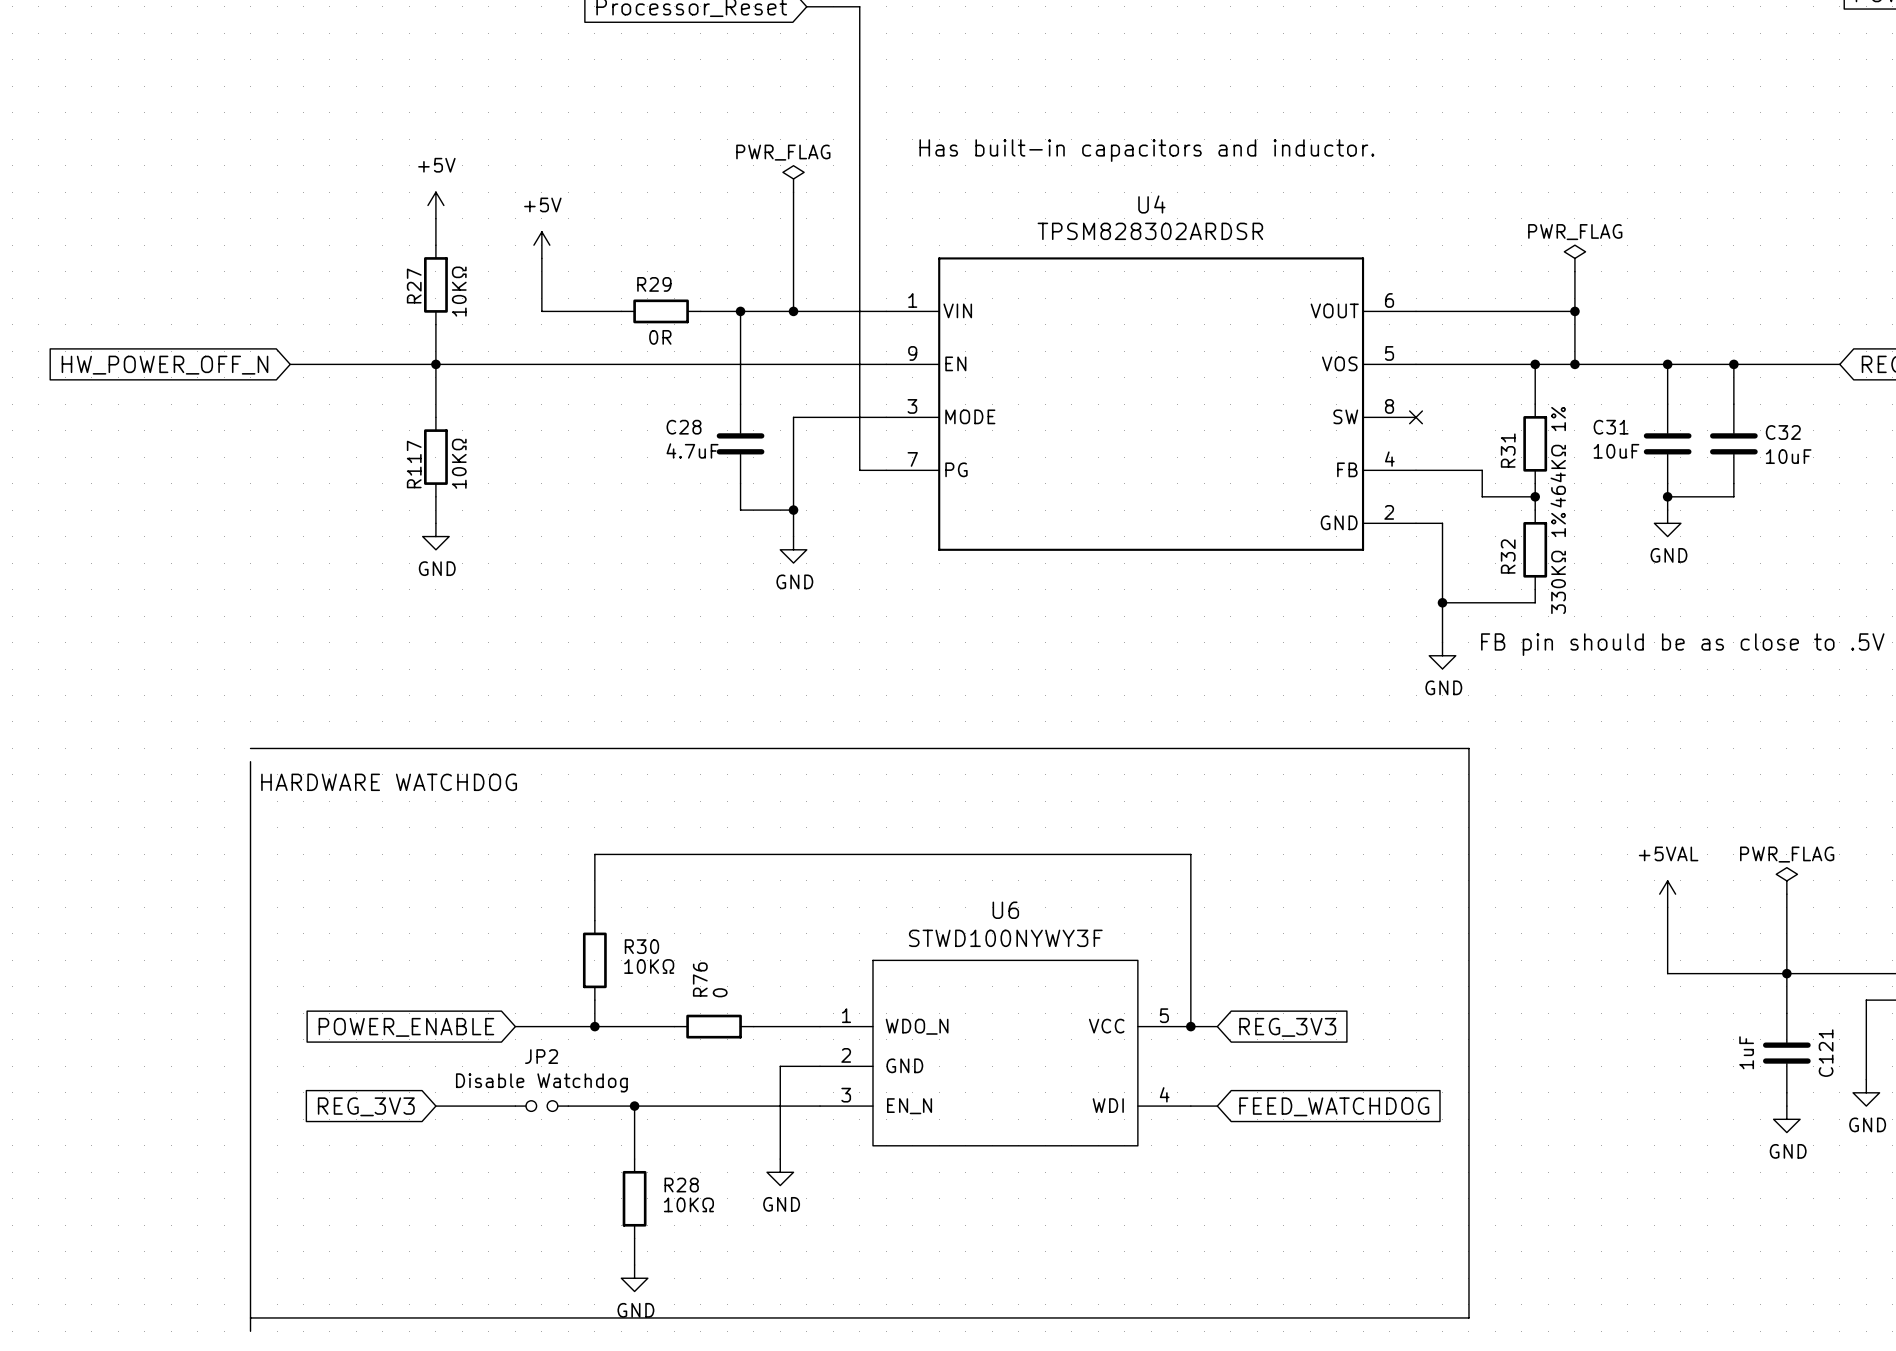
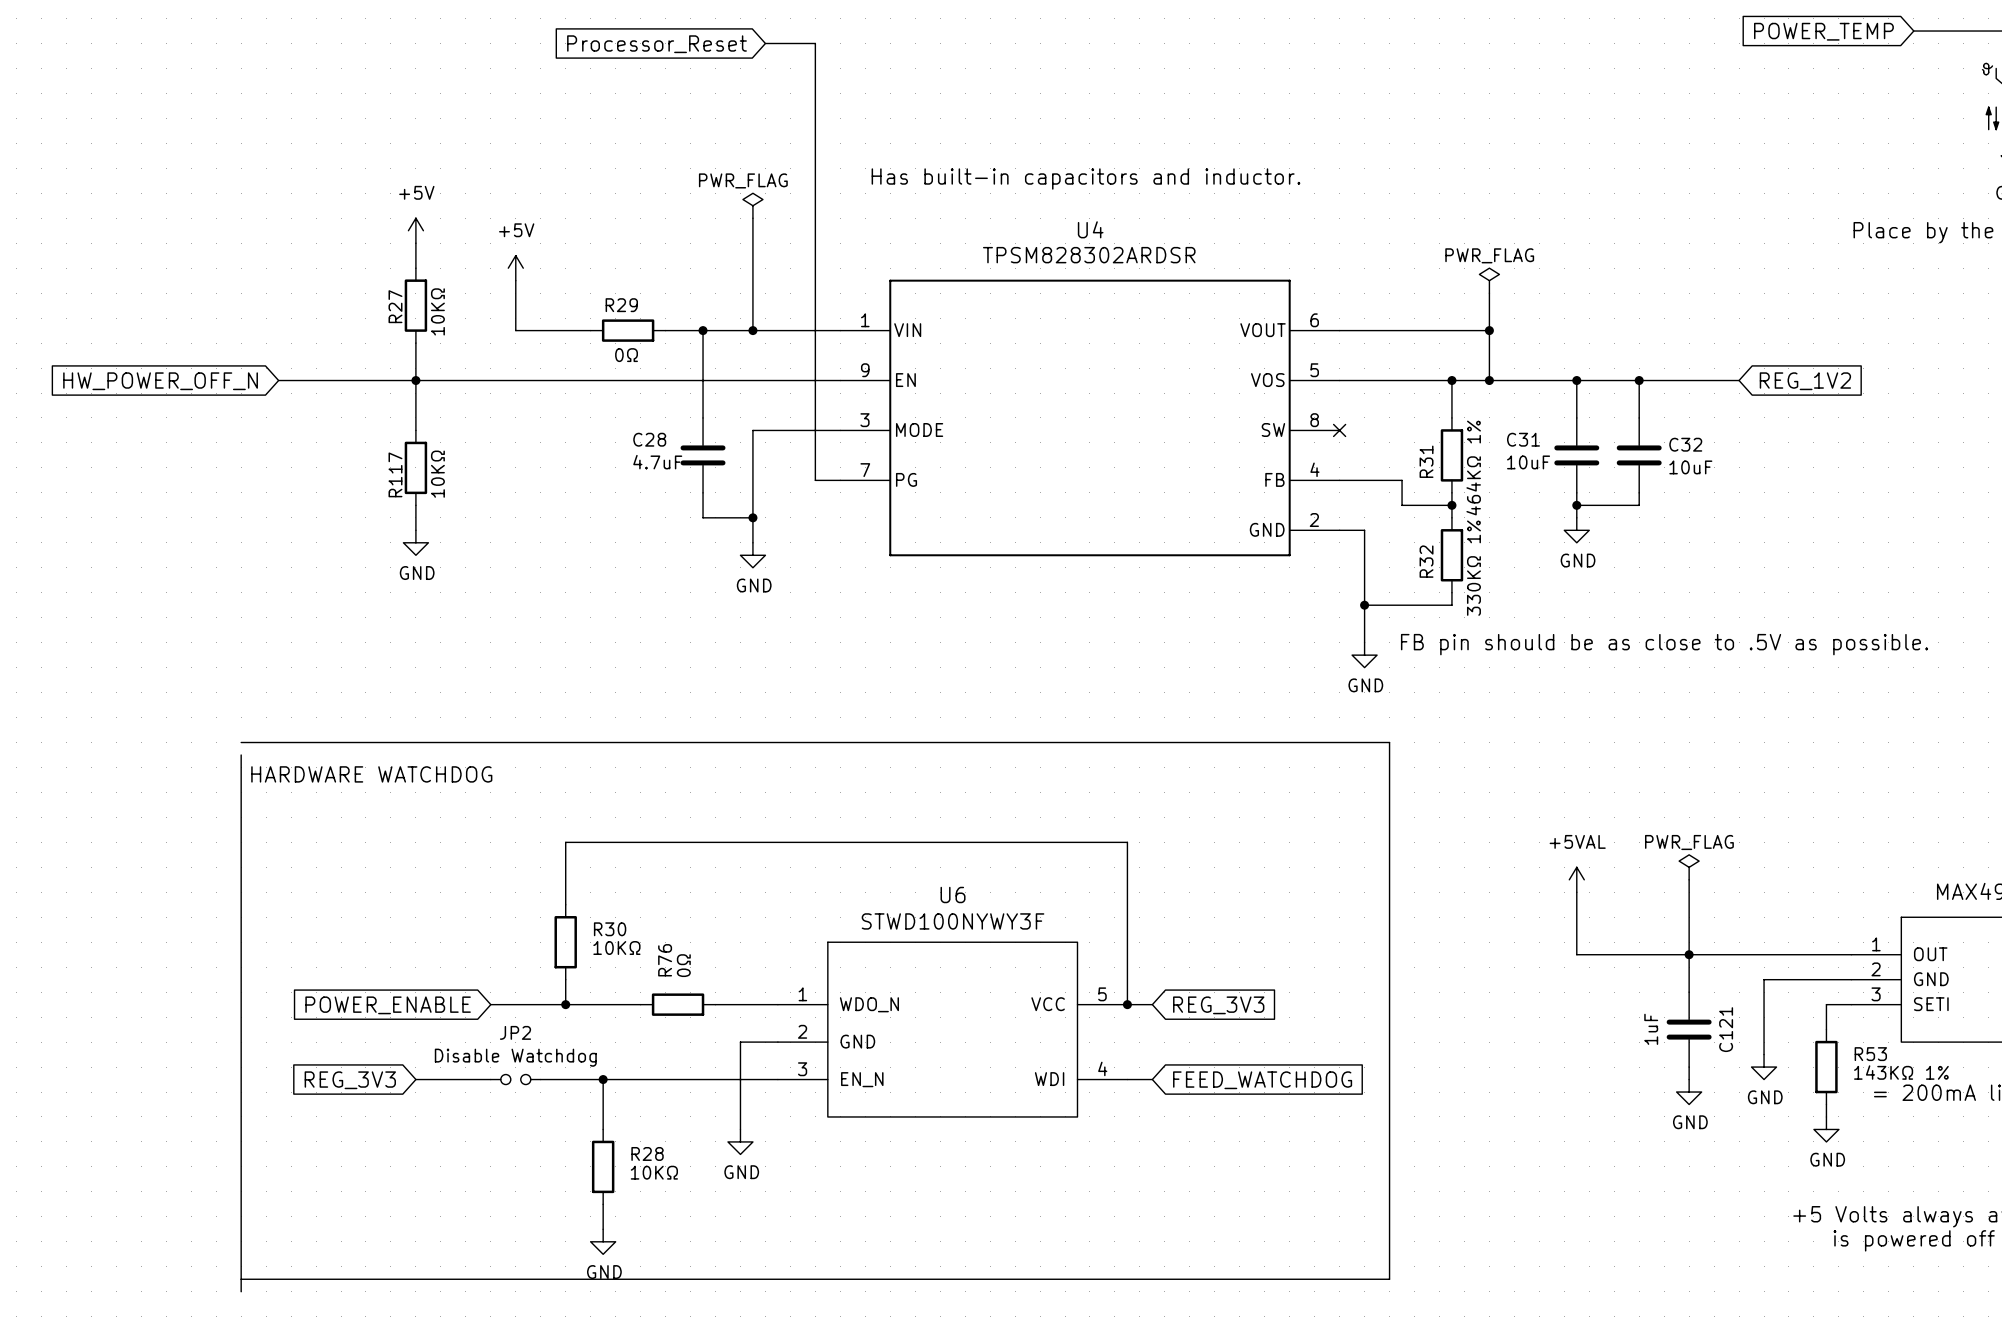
R29 value: 0R (660, 337) -> 0Ω (626, 355)
R76 value: 0 (720, 992) -> 0Ω (683, 965)

